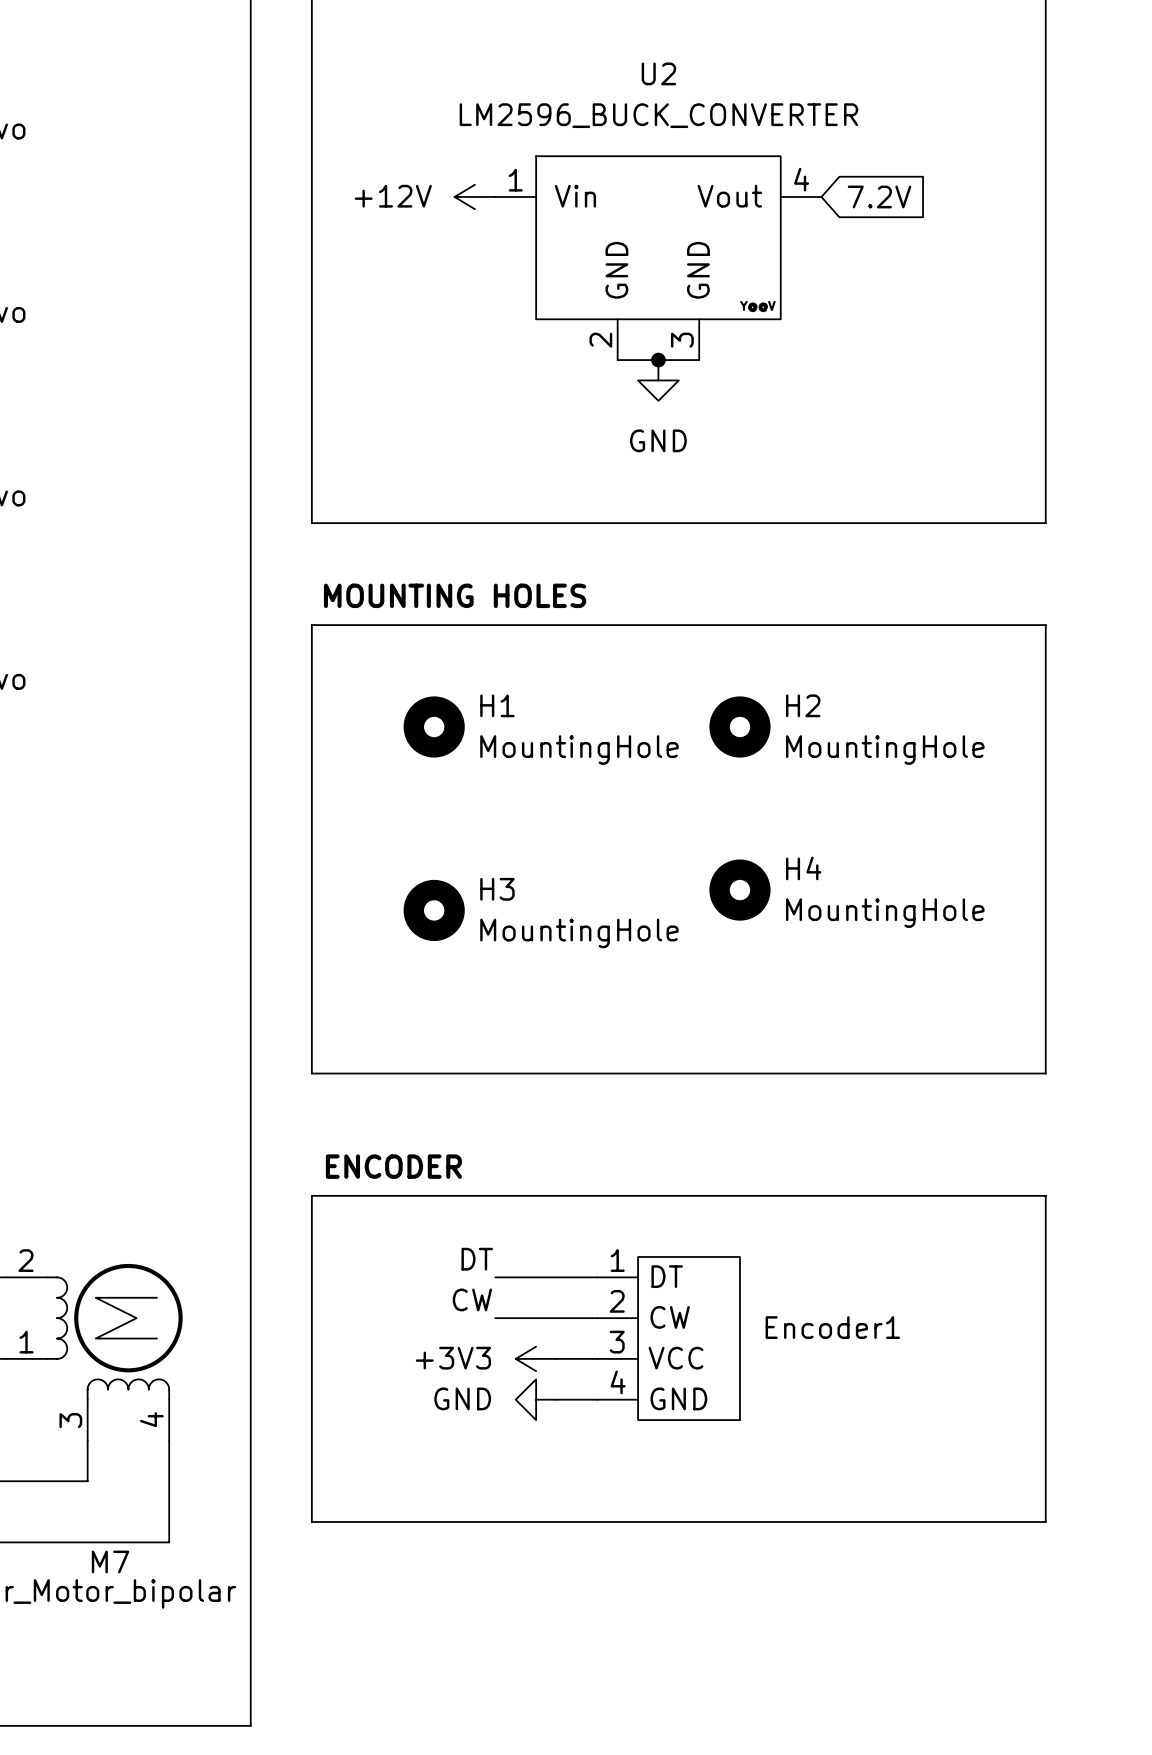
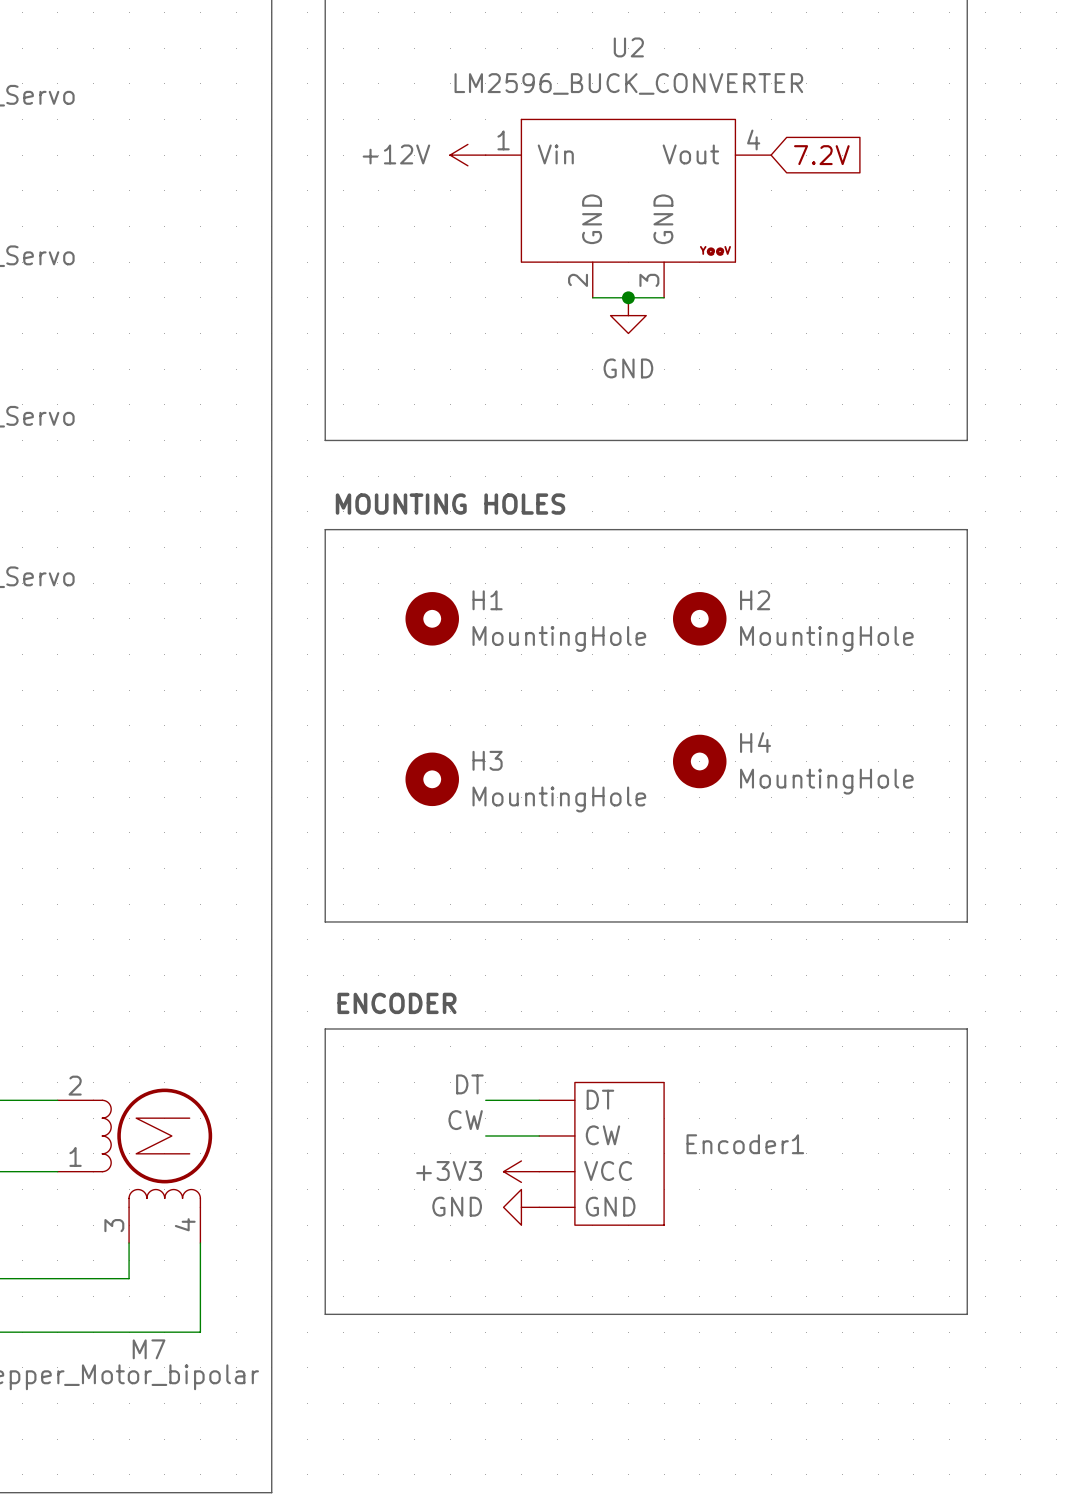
Encoder1 pin number: 1 (617, 1260) -> none
Encoder1 pin number: 2 (617, 1301) -> none
Encoder1 position: (668, 1338) -> (601, 1153)
Encoder1 pin number: 3 (617, 1342) -> none
Encoder1 pin number: 4 (618, 1382) -> none

